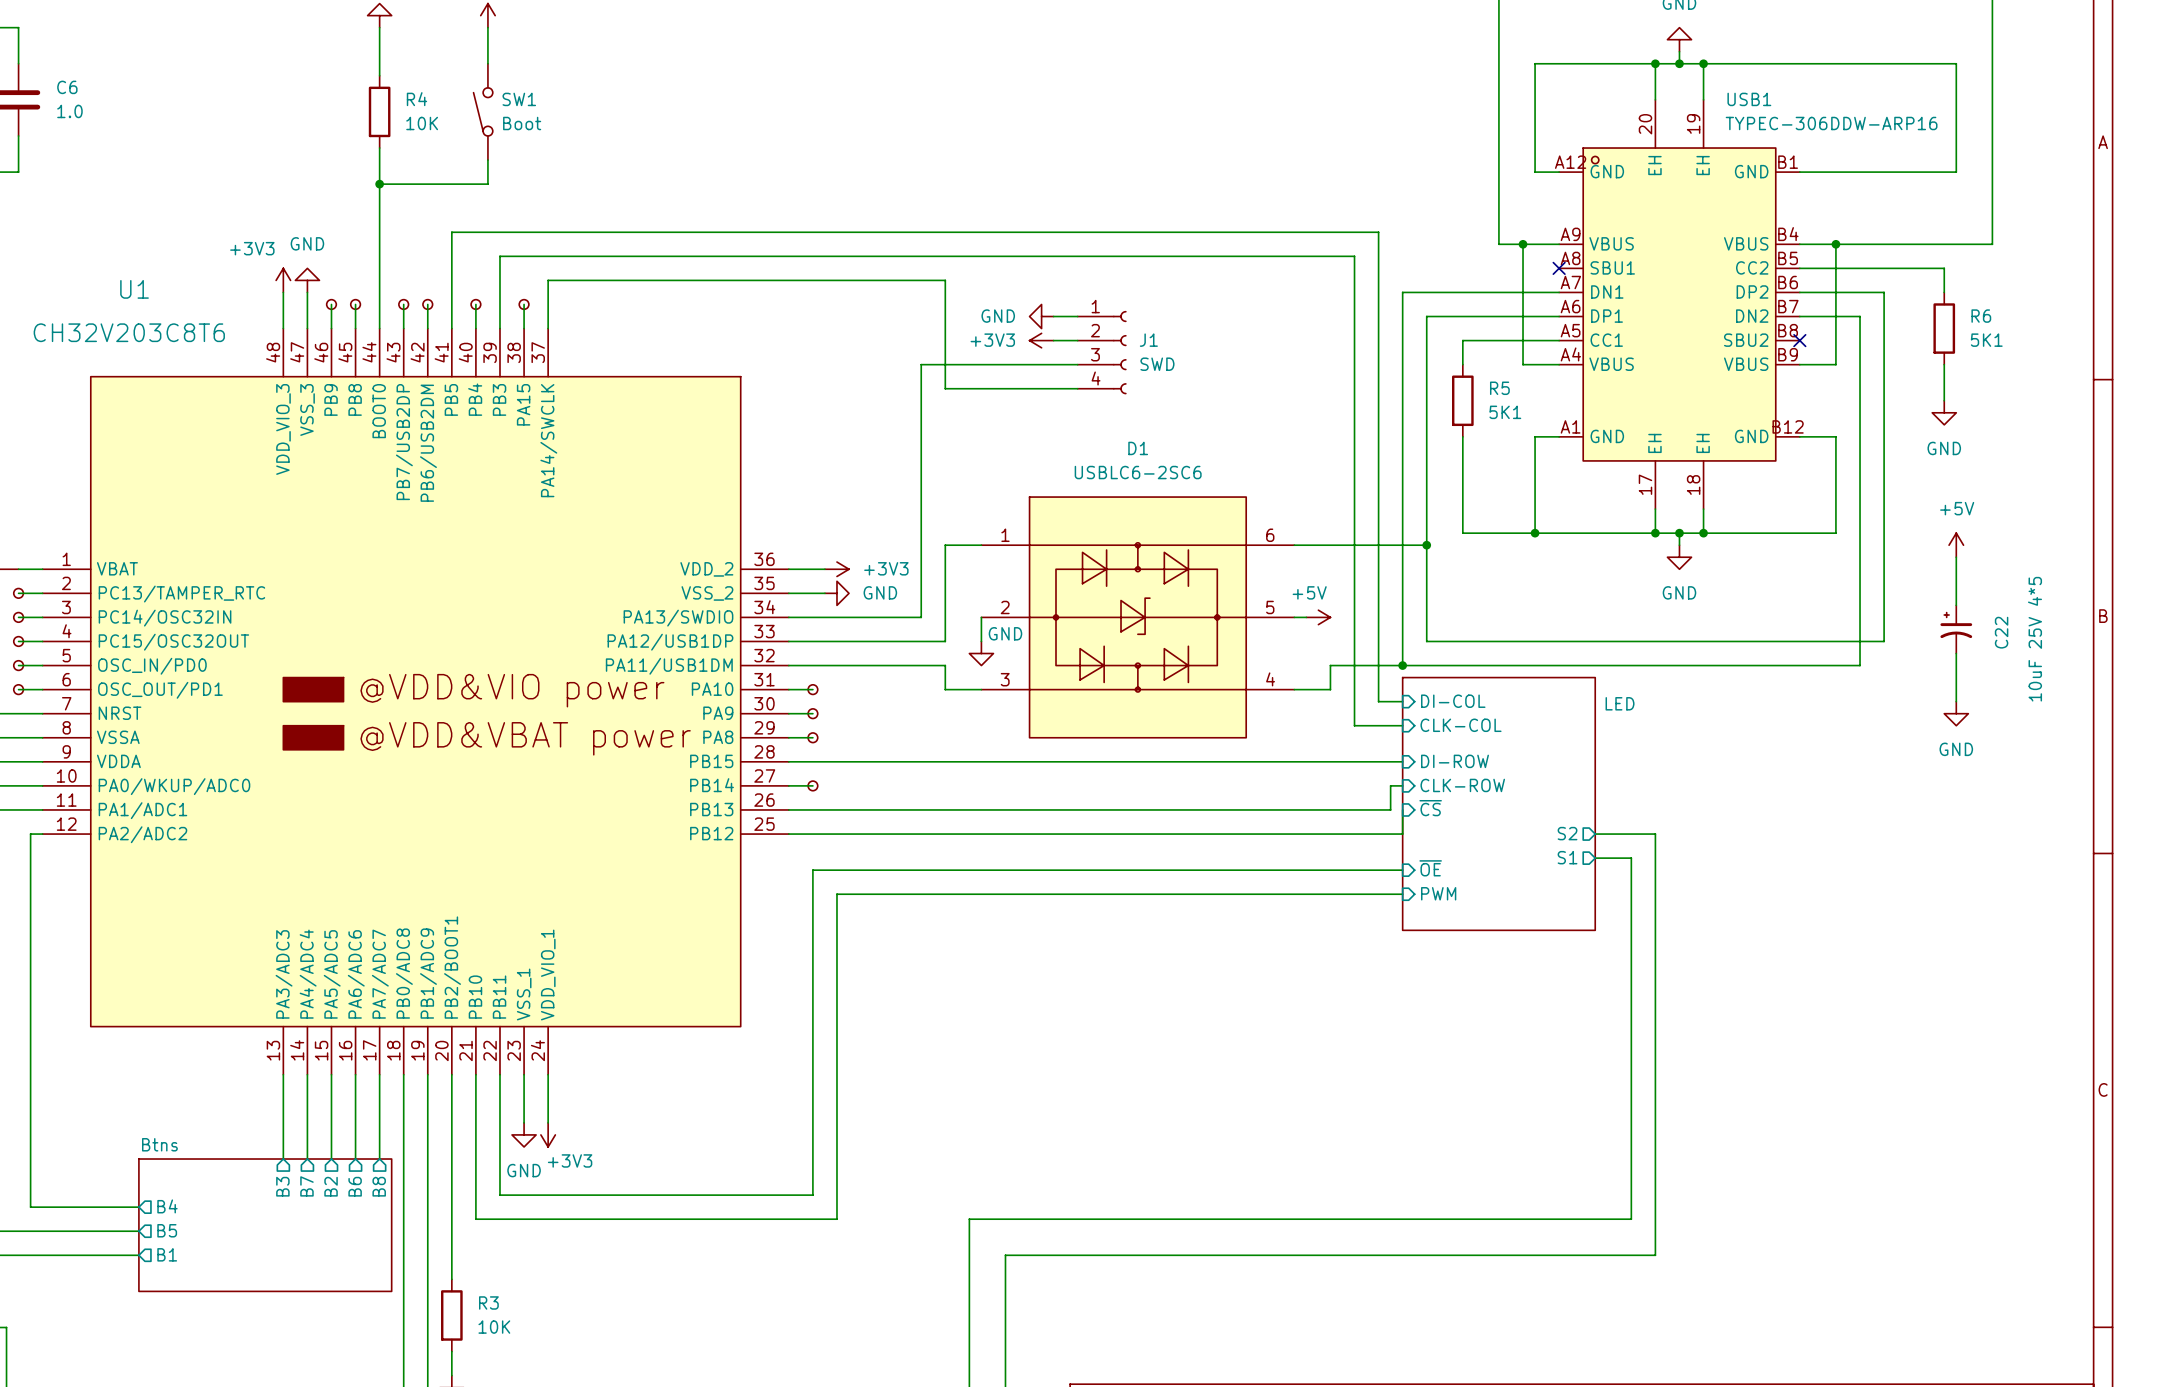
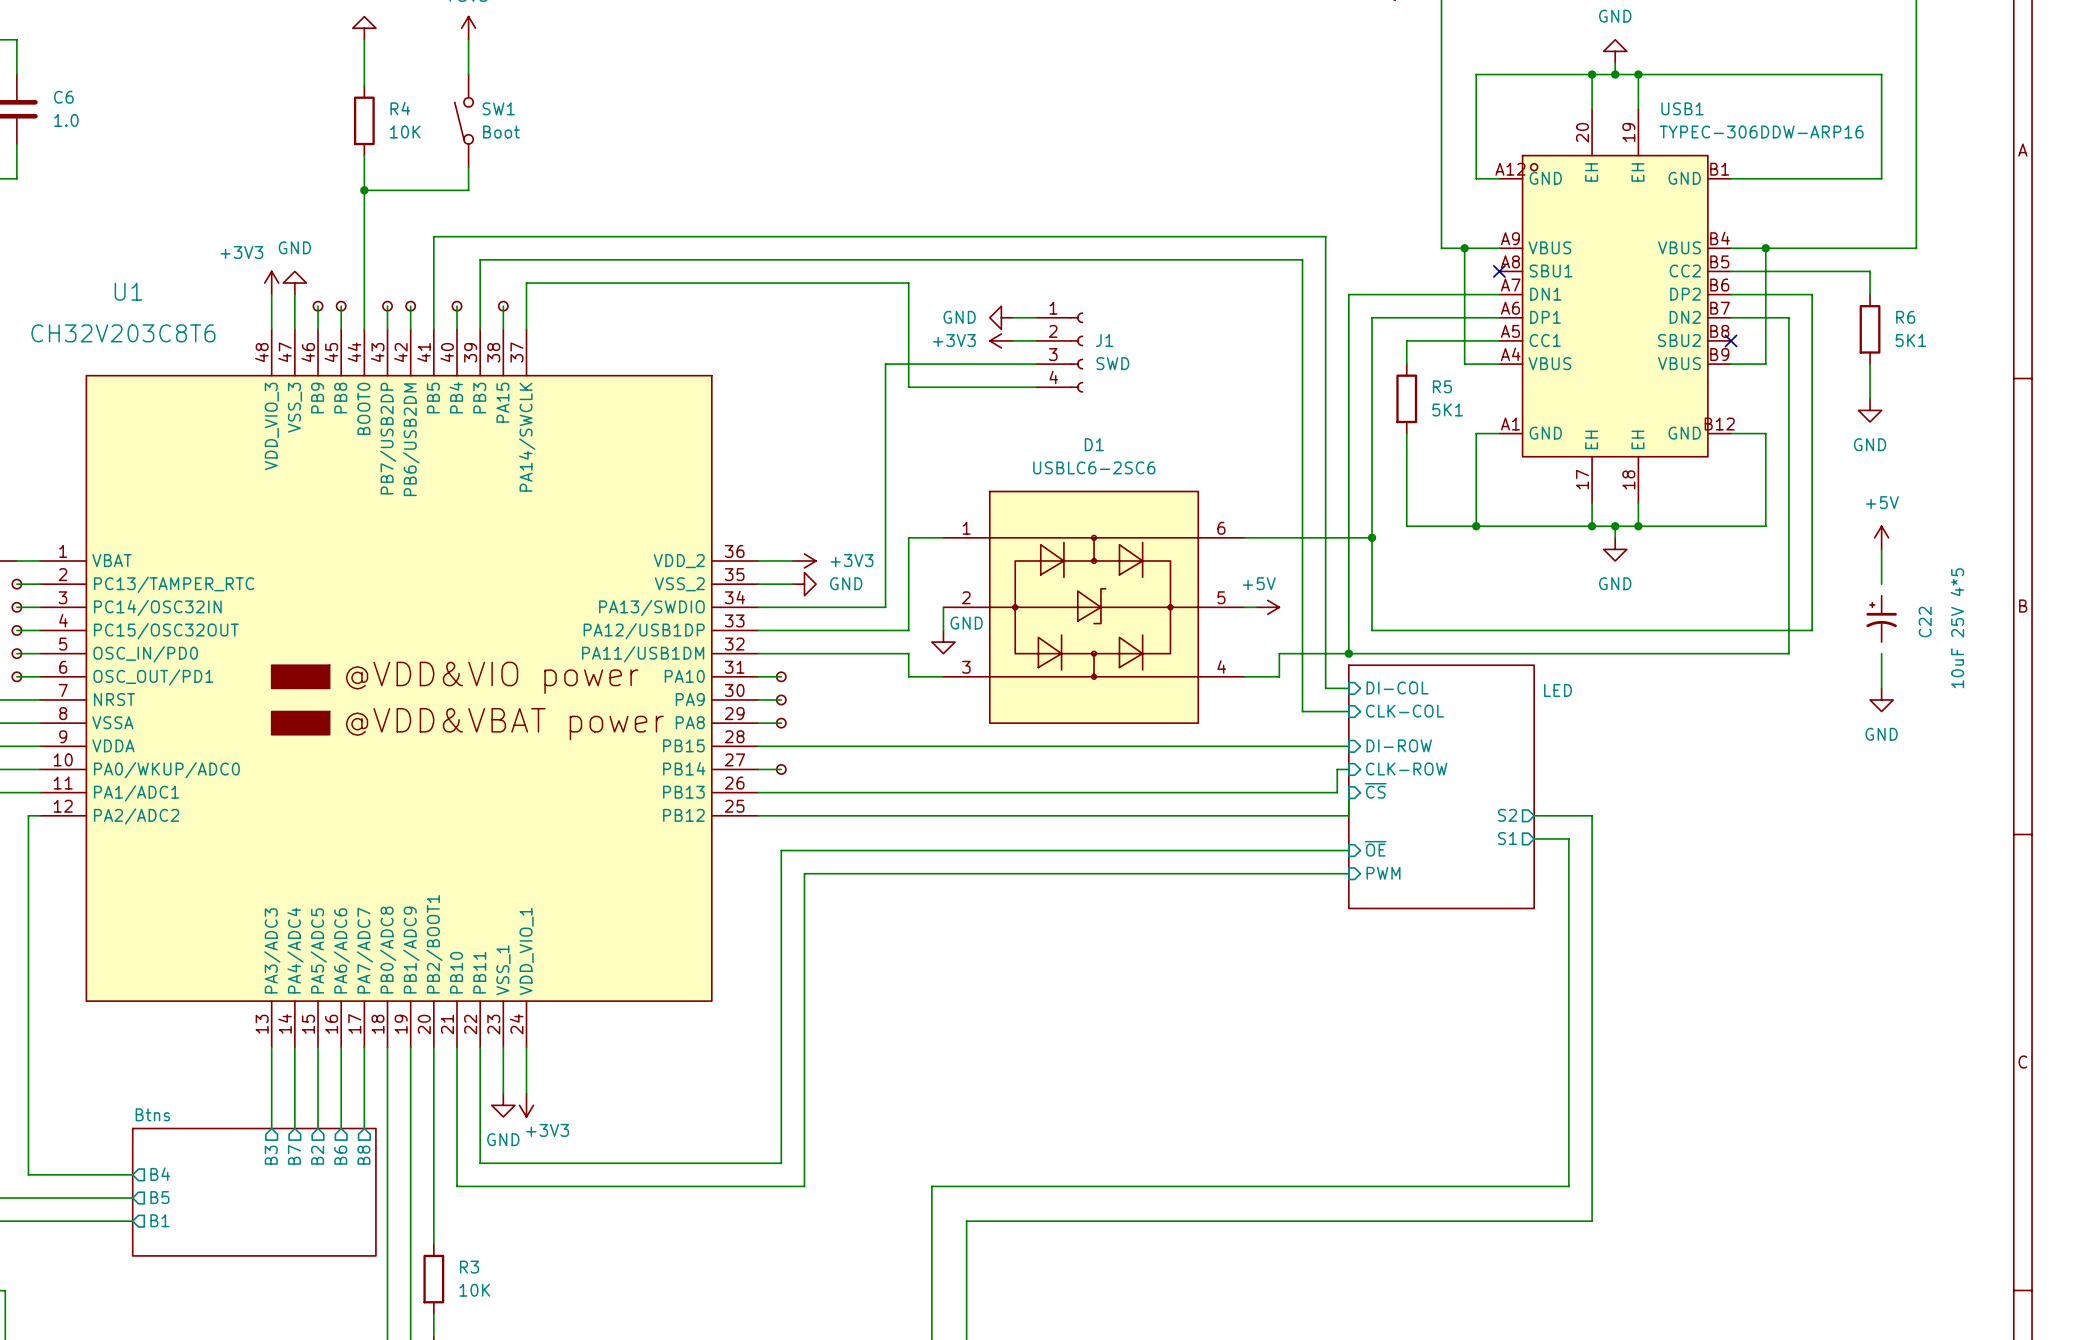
wire: (1956, 593) (1956, 605) -> none
wire: (1956, 653) (1956, 665) -> none

